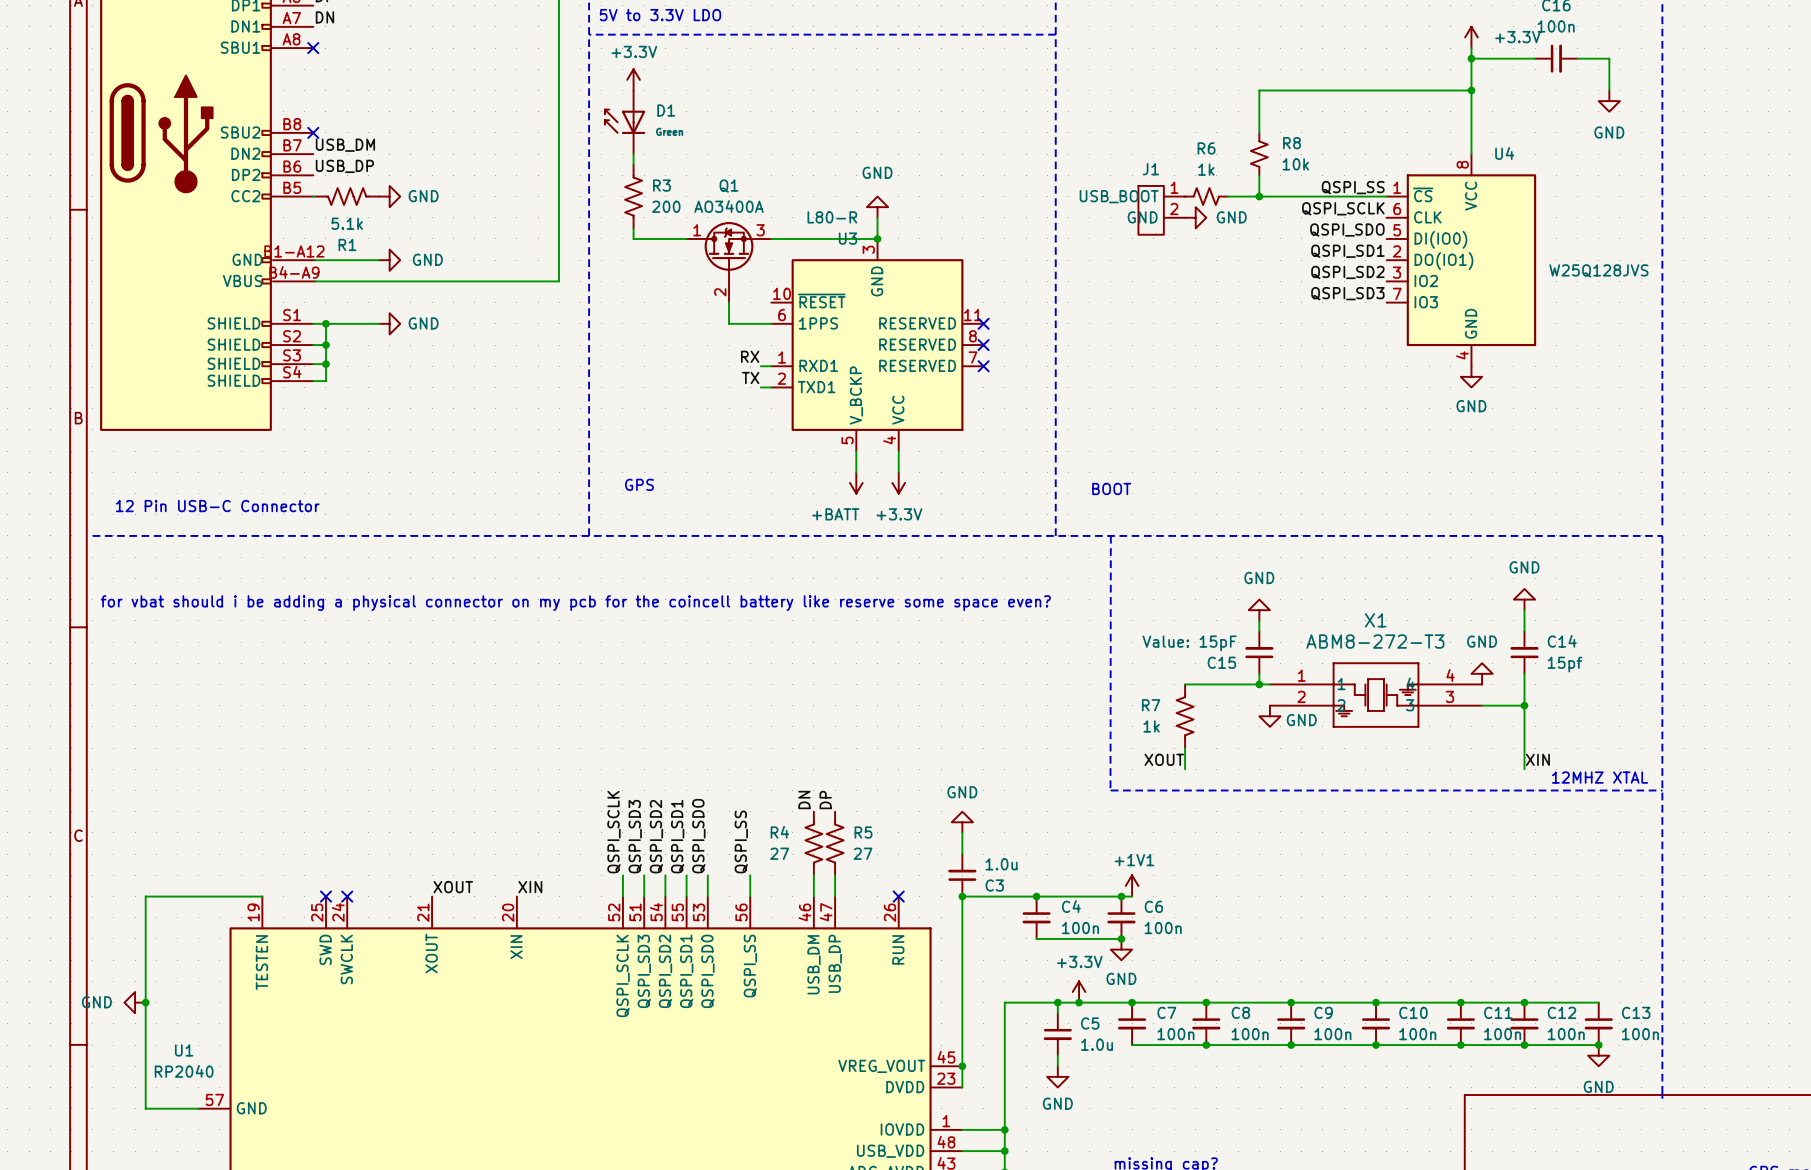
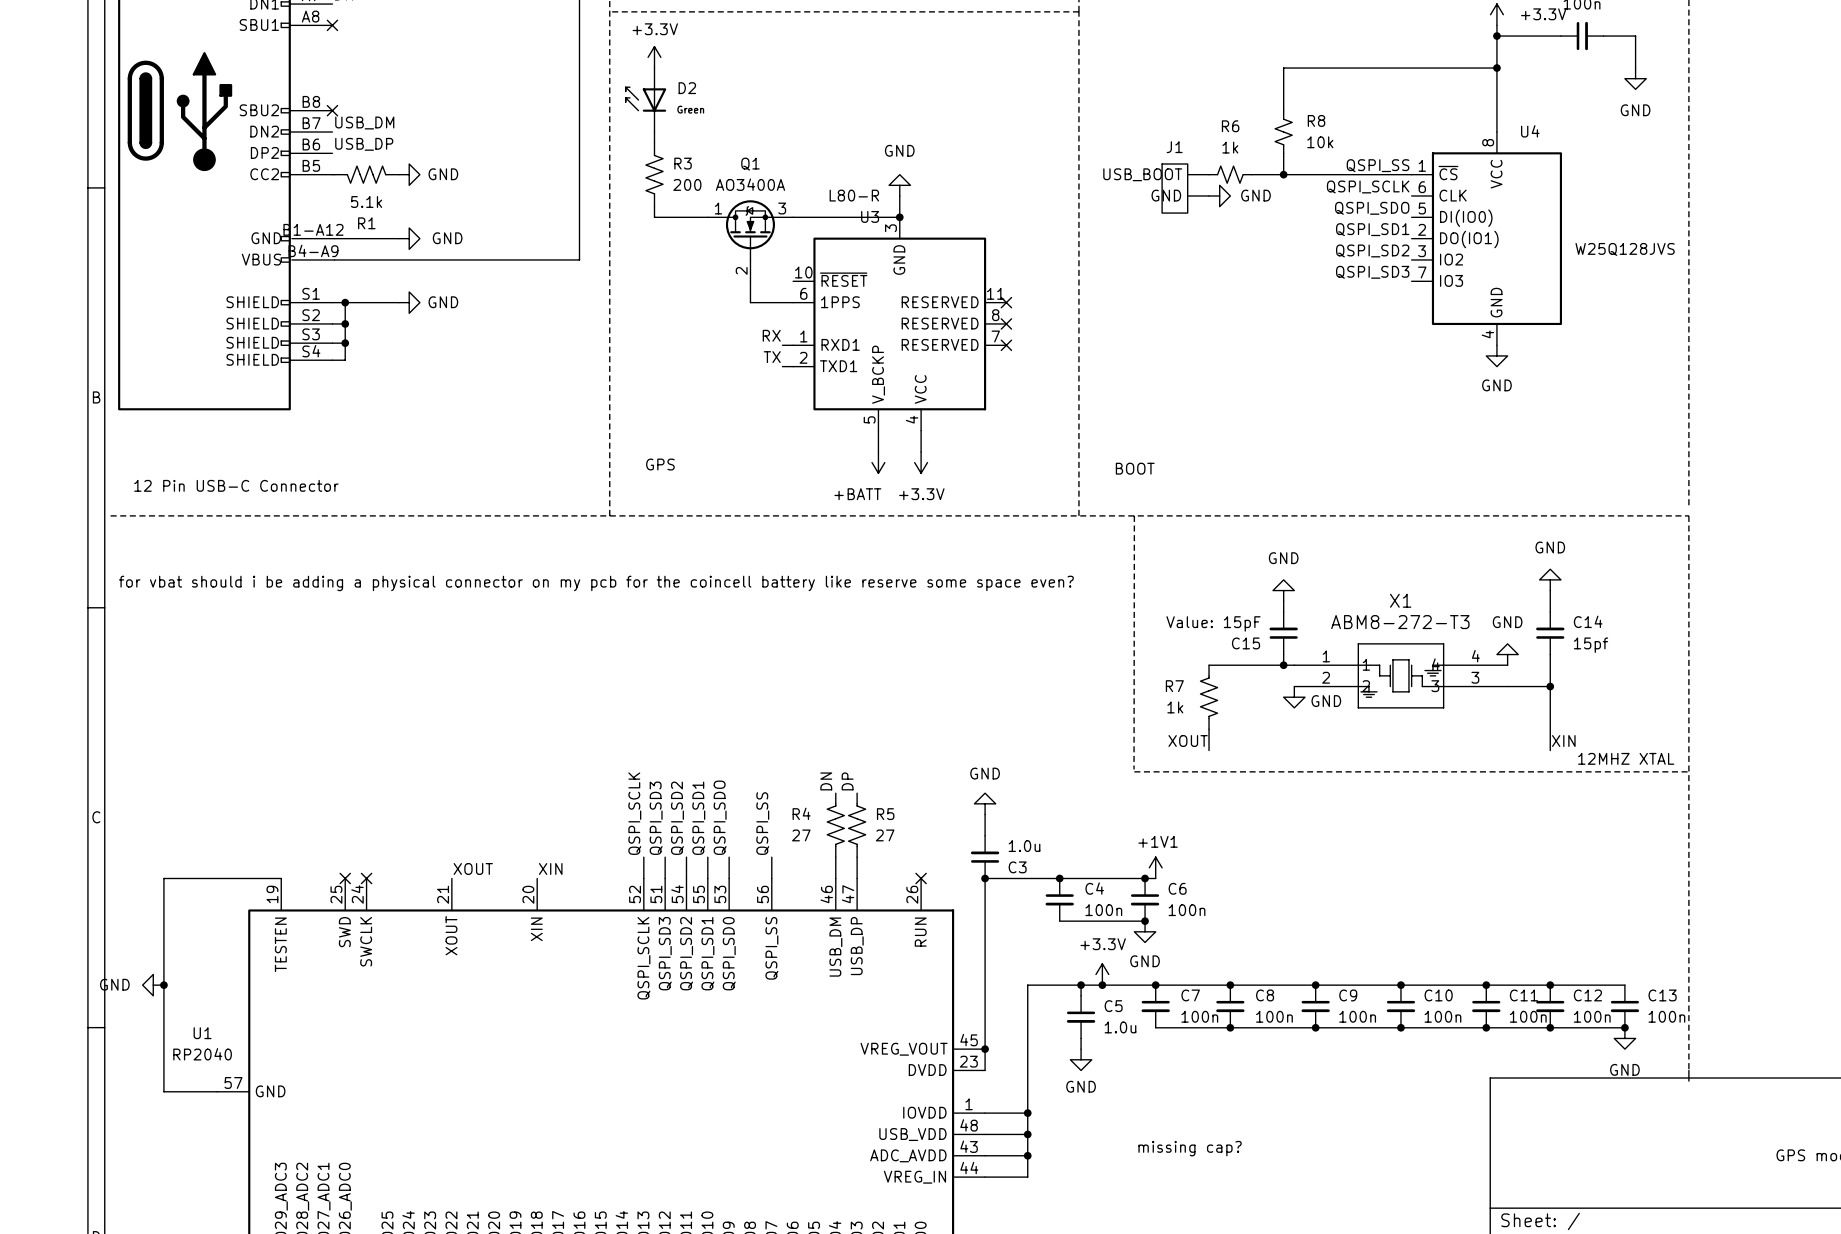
D1 name: D1 (666, 110) -> D2 (687, 88)
J1 pin number: 1 (1174, 187) -> none
J1 pin number: 2 (1174, 209) -> none

